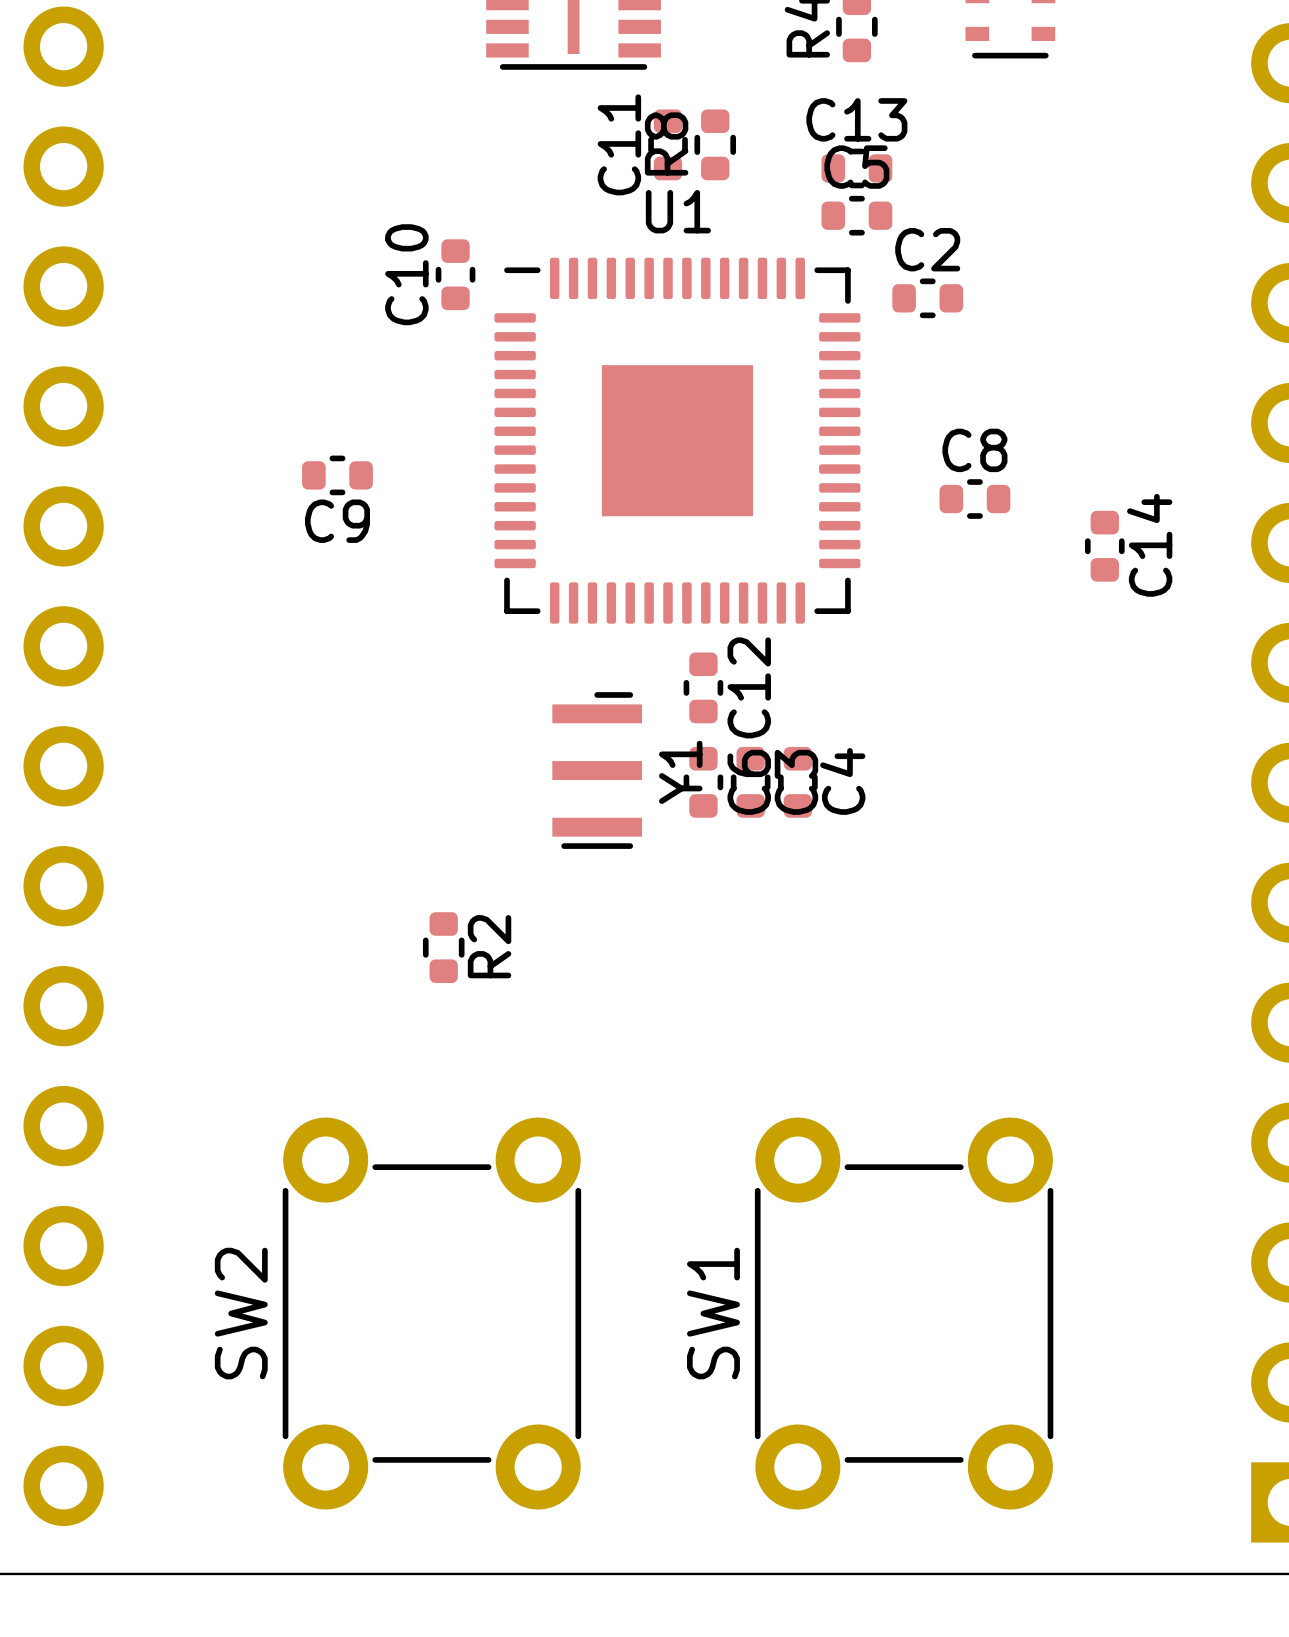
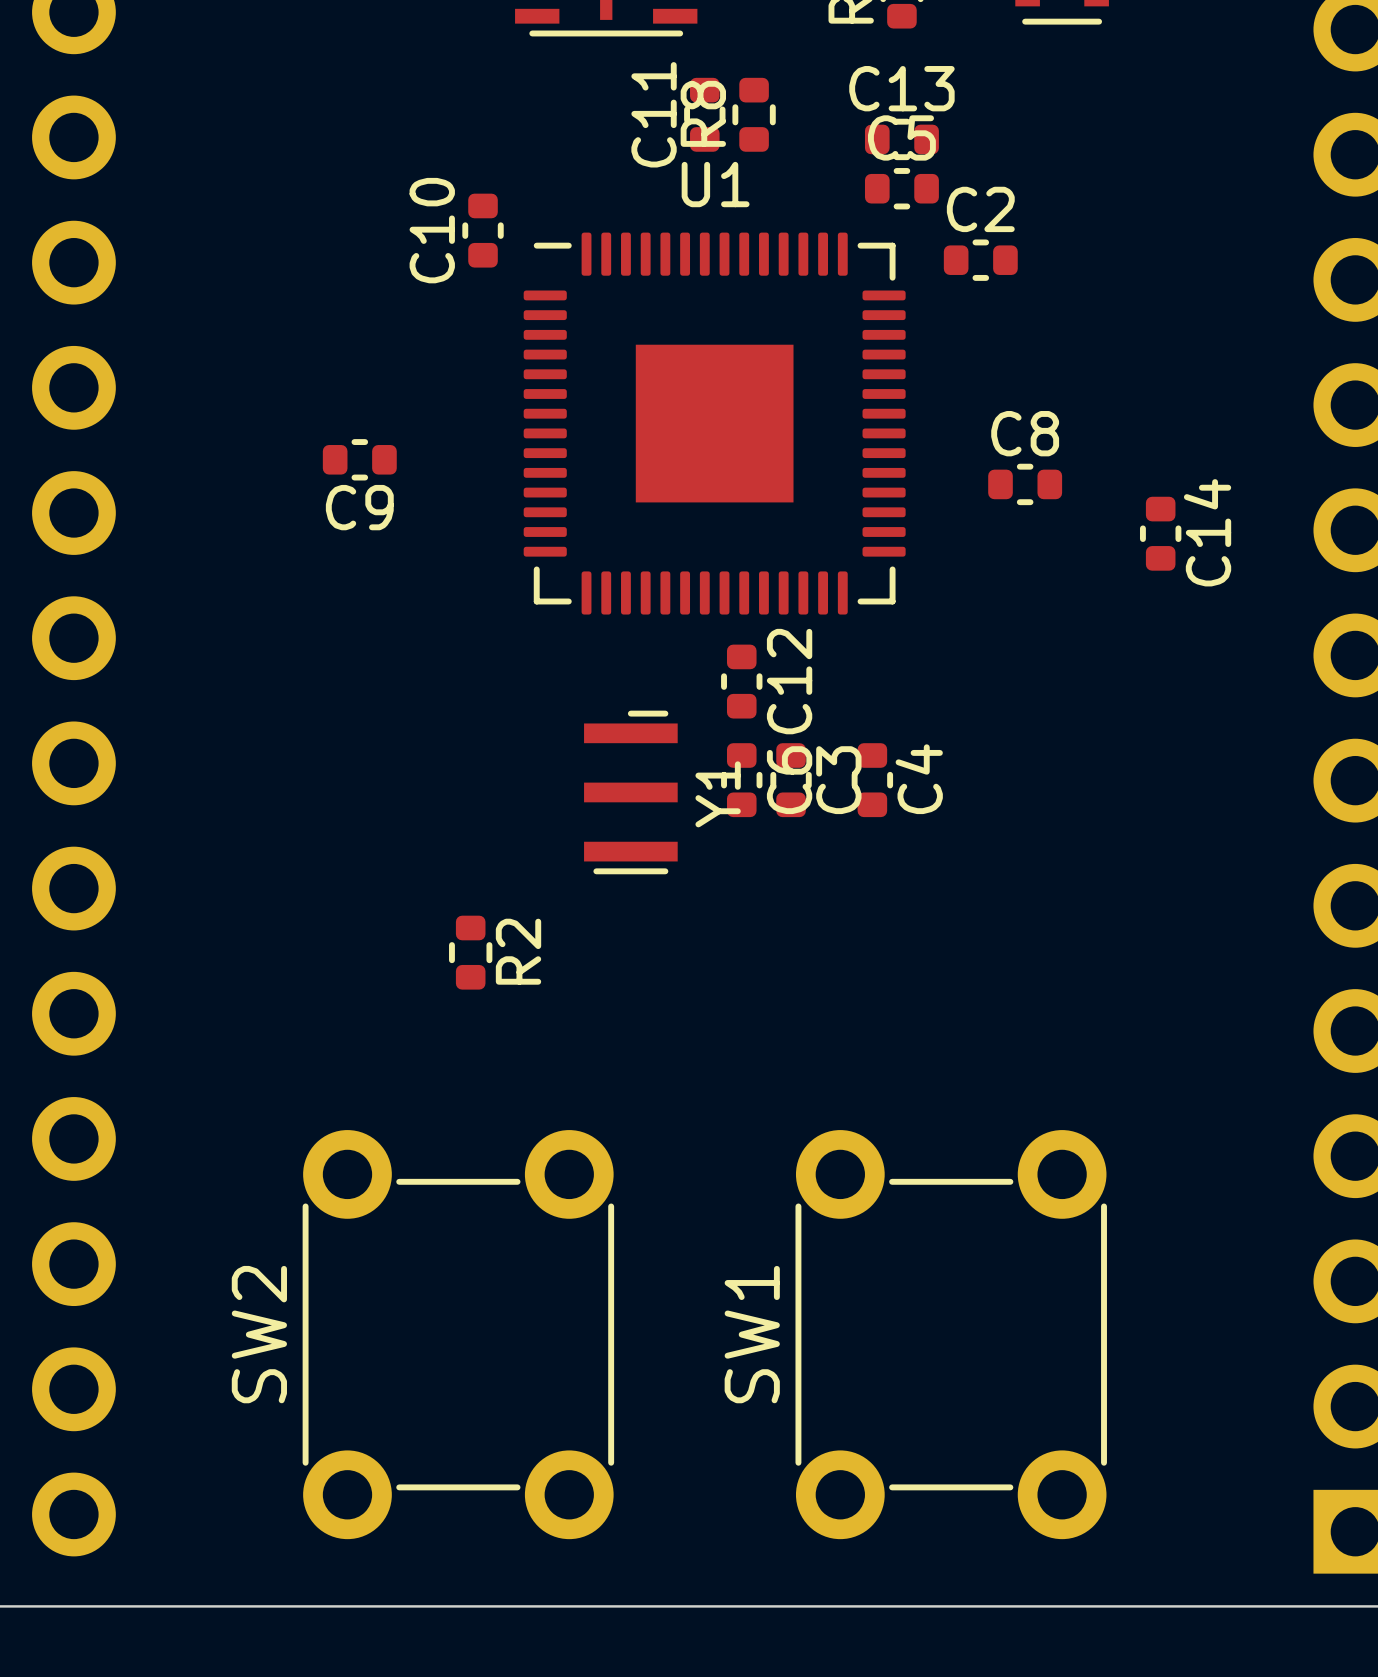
C10 position: (455, 274) -> (483, 230)
C2 position: (927, 298) -> (980, 260)
Y1 position: (597, 770) -> (630, 792)
C4 position: (797, 782) -> (872, 780)

